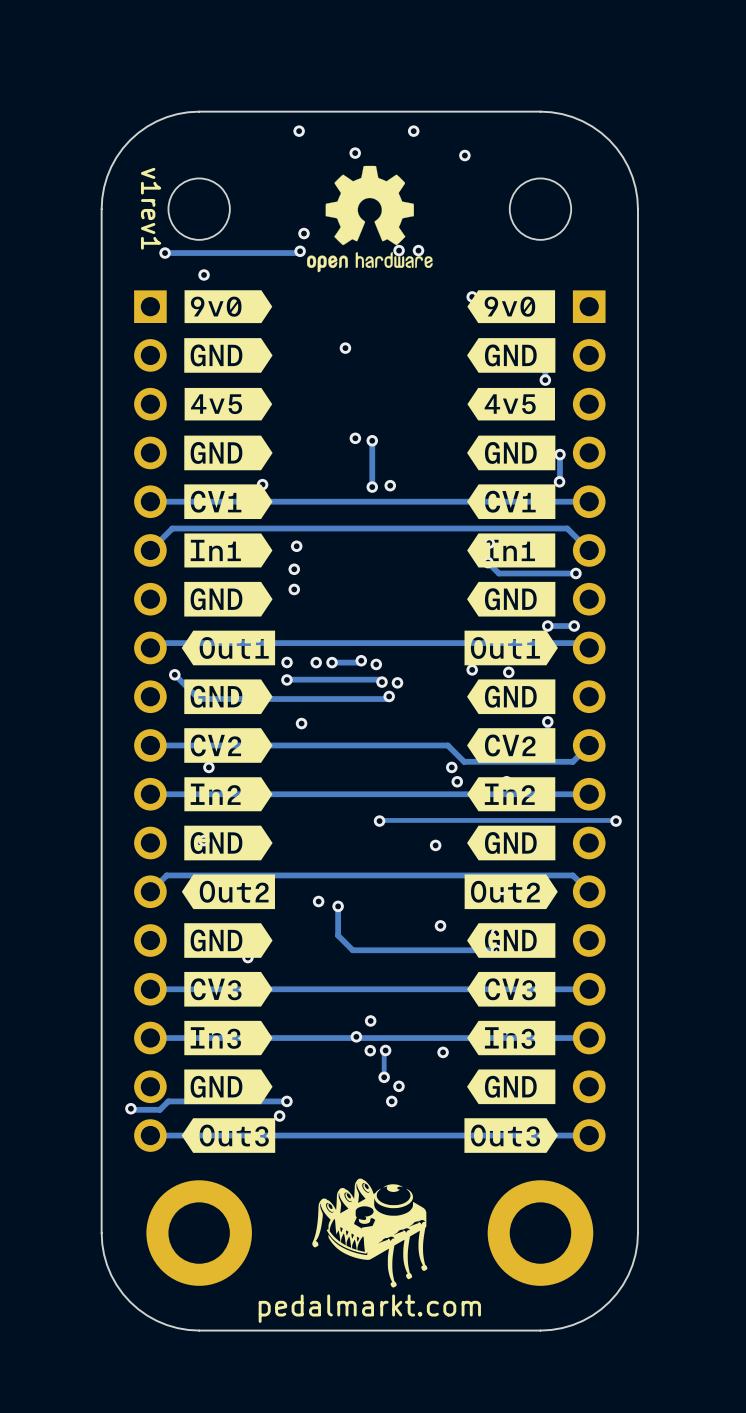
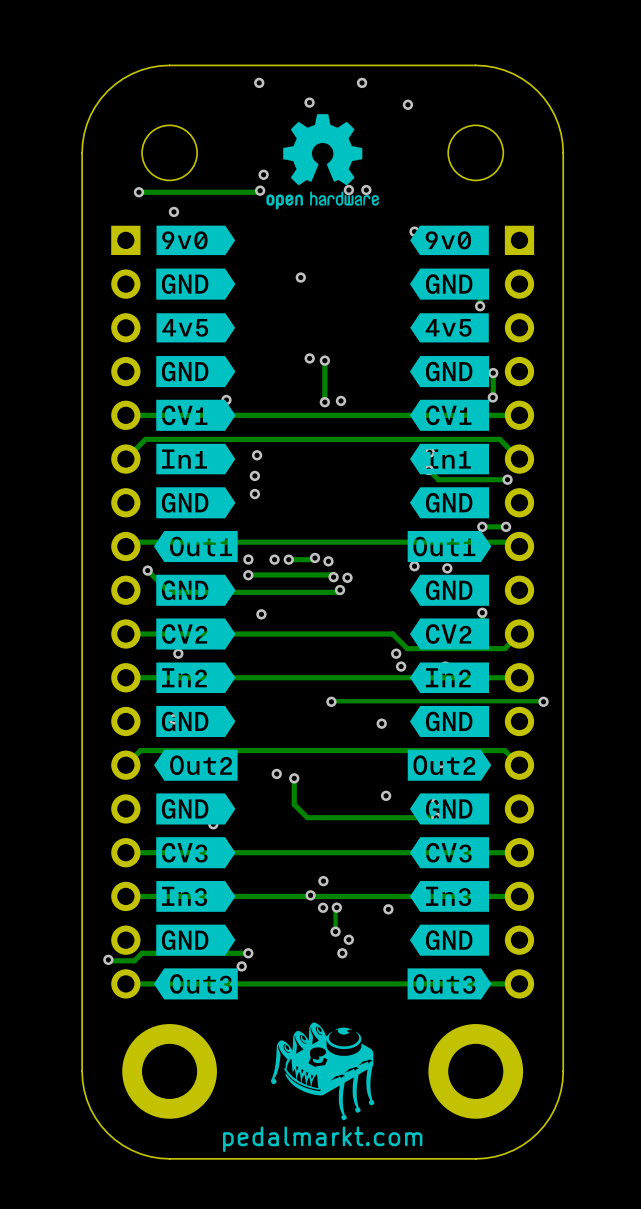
text: v1rev1 (151, 208) -> none

